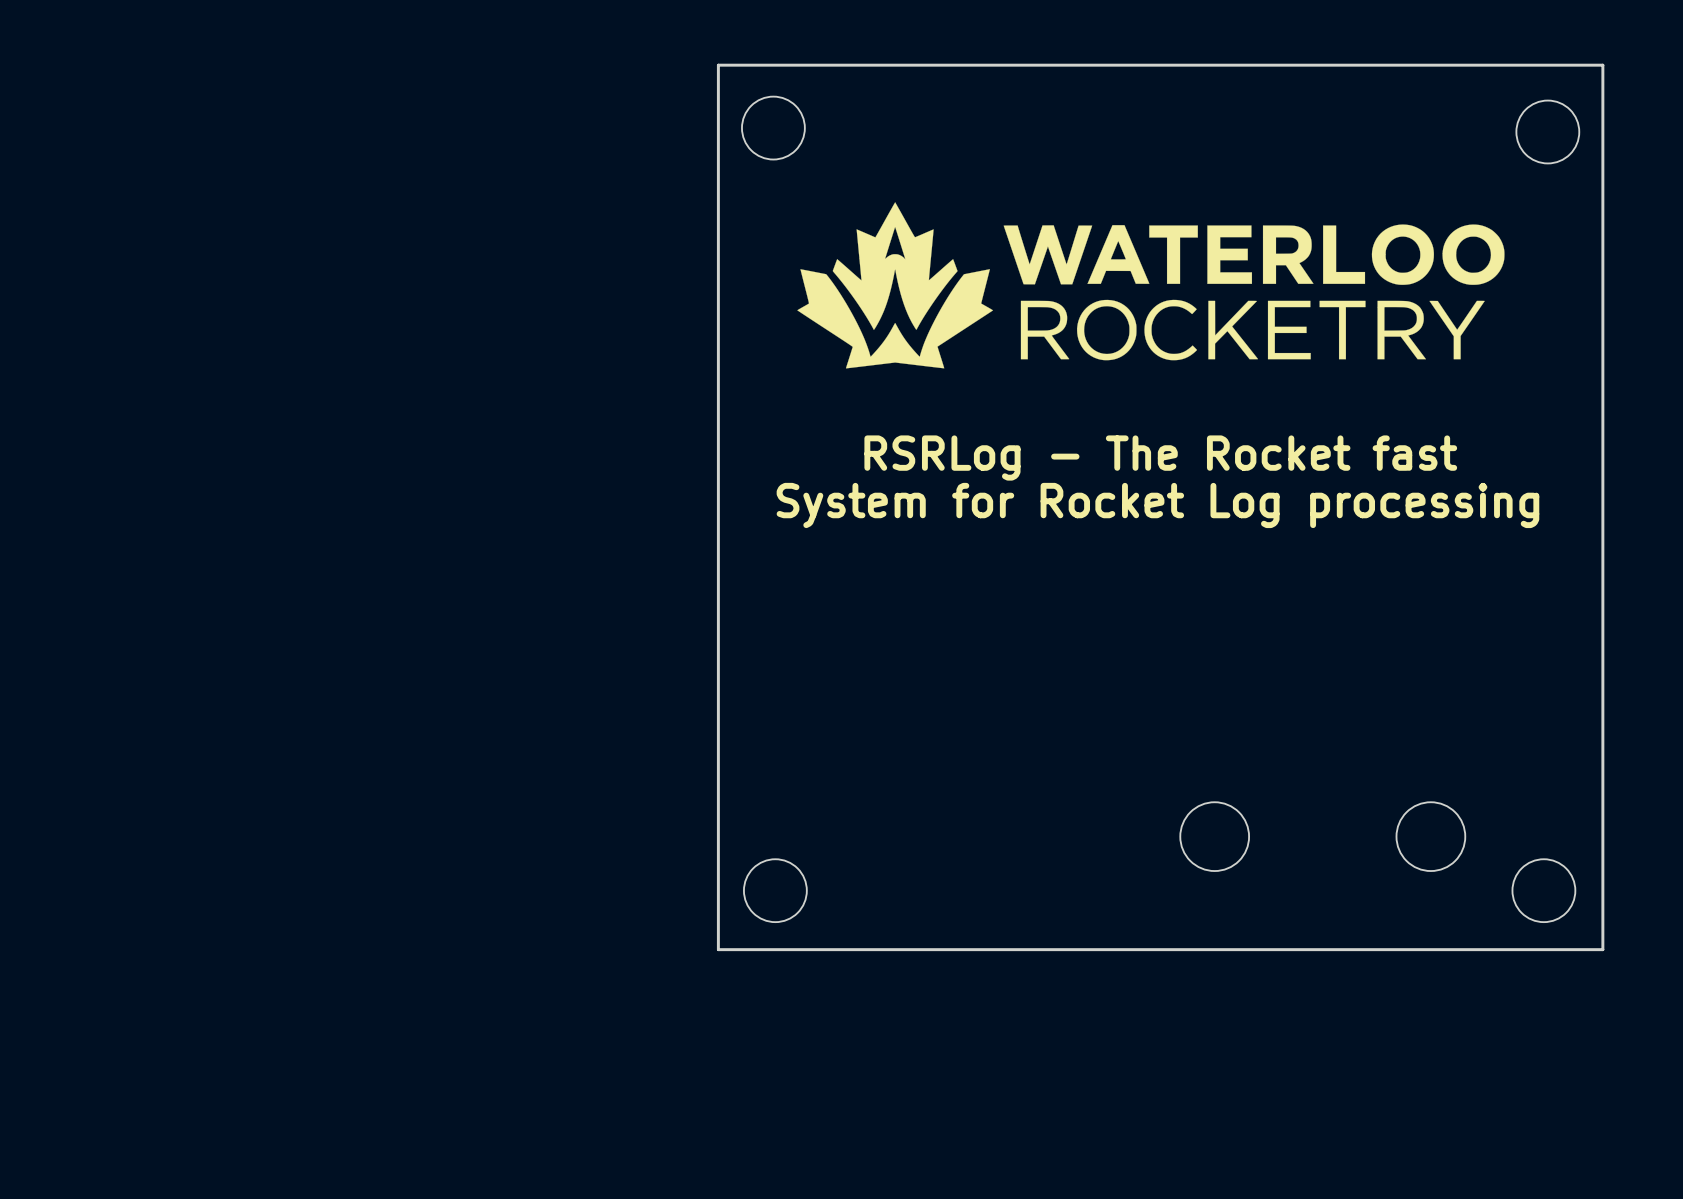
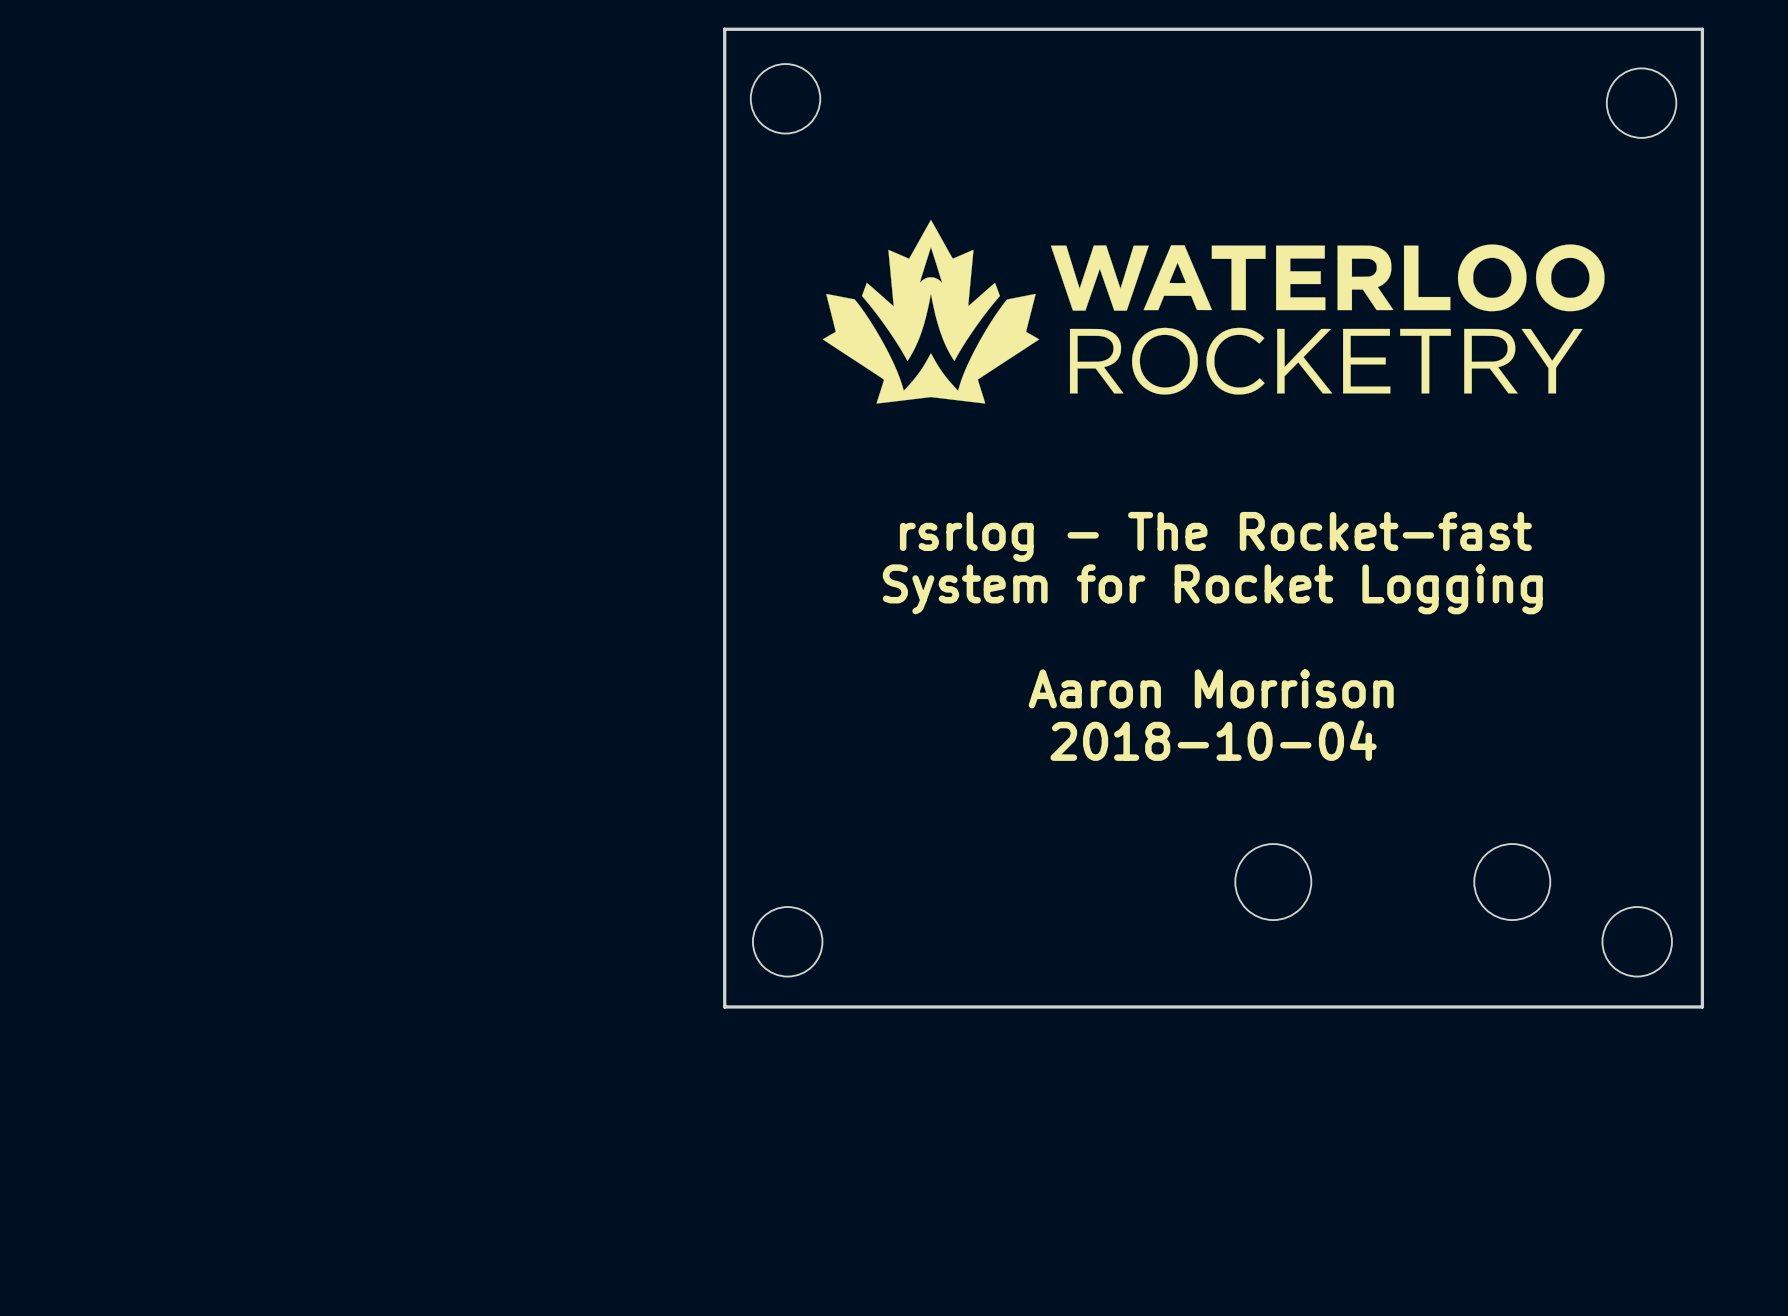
drawing position: (1150, 285) -> (1213, 311)
text: RSRLog - The Rocket fast (1160, 458) -> none
text: System for Rocket Log processing (1157, 505) -> rsrlog - The Rocket-fast (1215, 536)
text: none -> System for Rocket Logging (1212, 589)
text: none -> Aaron Morrison (1211, 688)
text: none -> 2018-10-04 (1213, 740)

